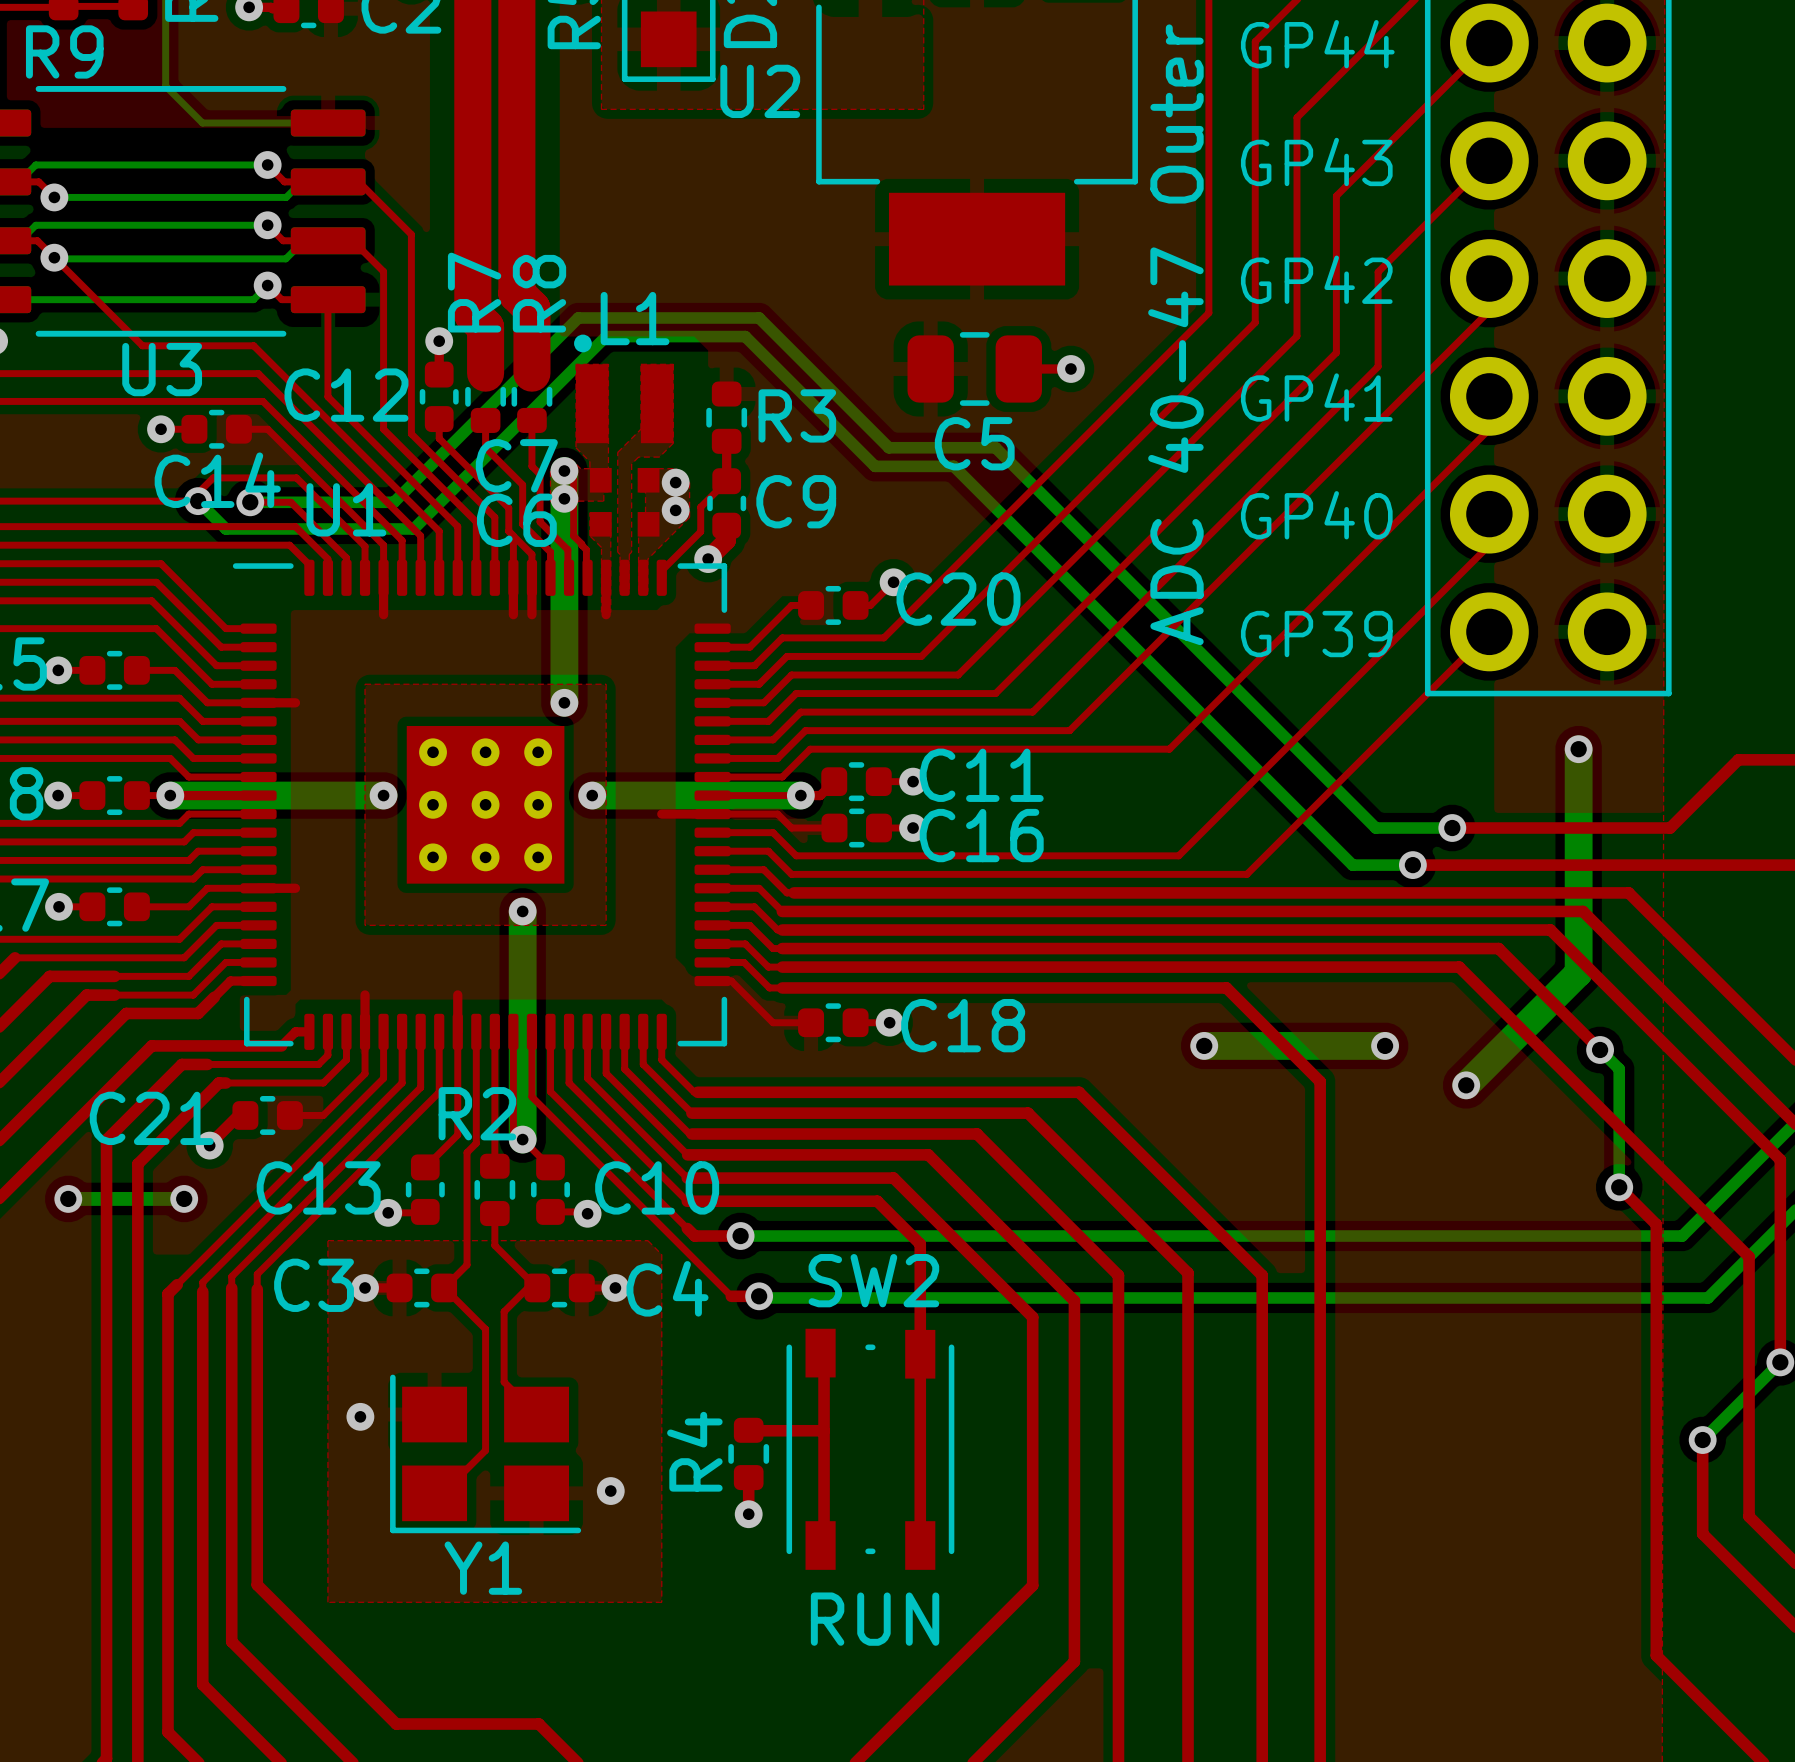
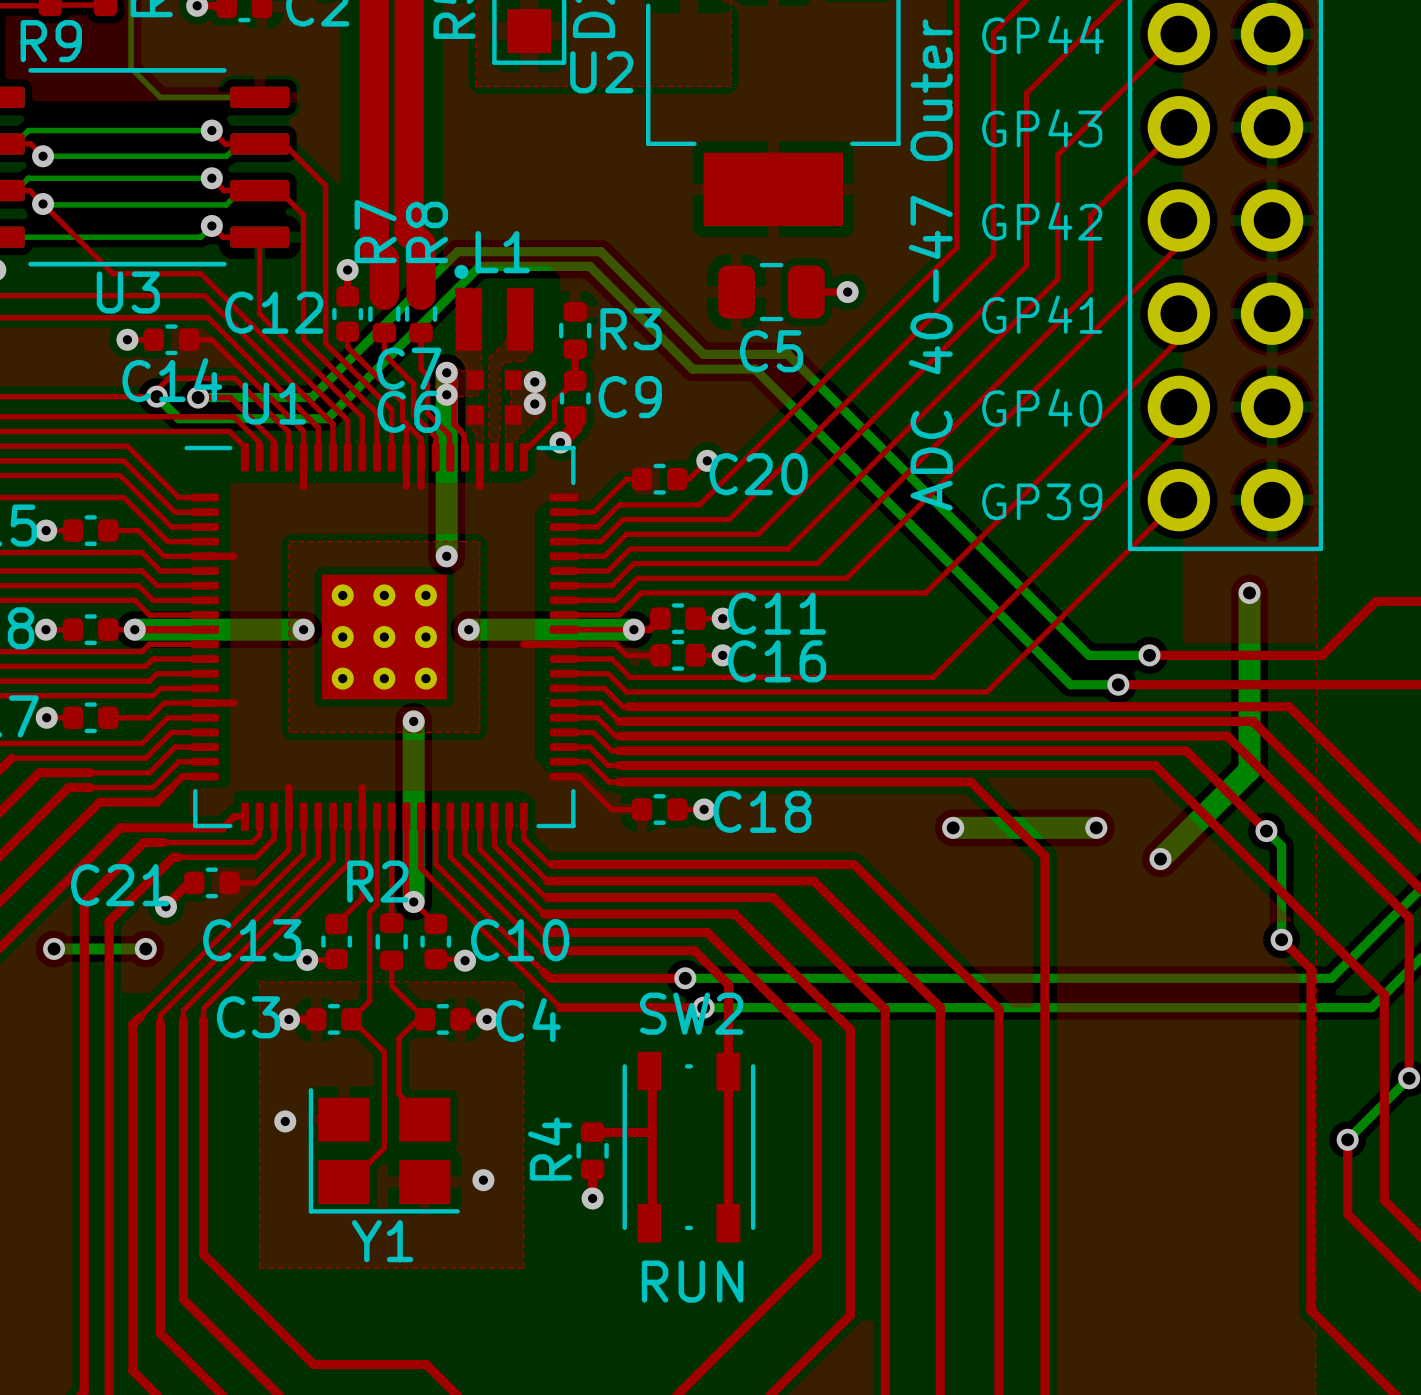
top track: none -> (586, 978) (685, 978)
bottom track: (740, 1236) (865, 1236) -> none
via: (740, 1236) -> none
via: none -> (685, 978)
top track: (708, 1273) (731, 1296) (759, 1296) -> (560, 1007) (703, 1007)
via: none -> (703, 1007)
bottom track: (1732, 1273) (1707, 1297) (760, 1297) (759, 1296) -> (1371, 1007) (703, 1007)
via: (759, 1296) -> none

